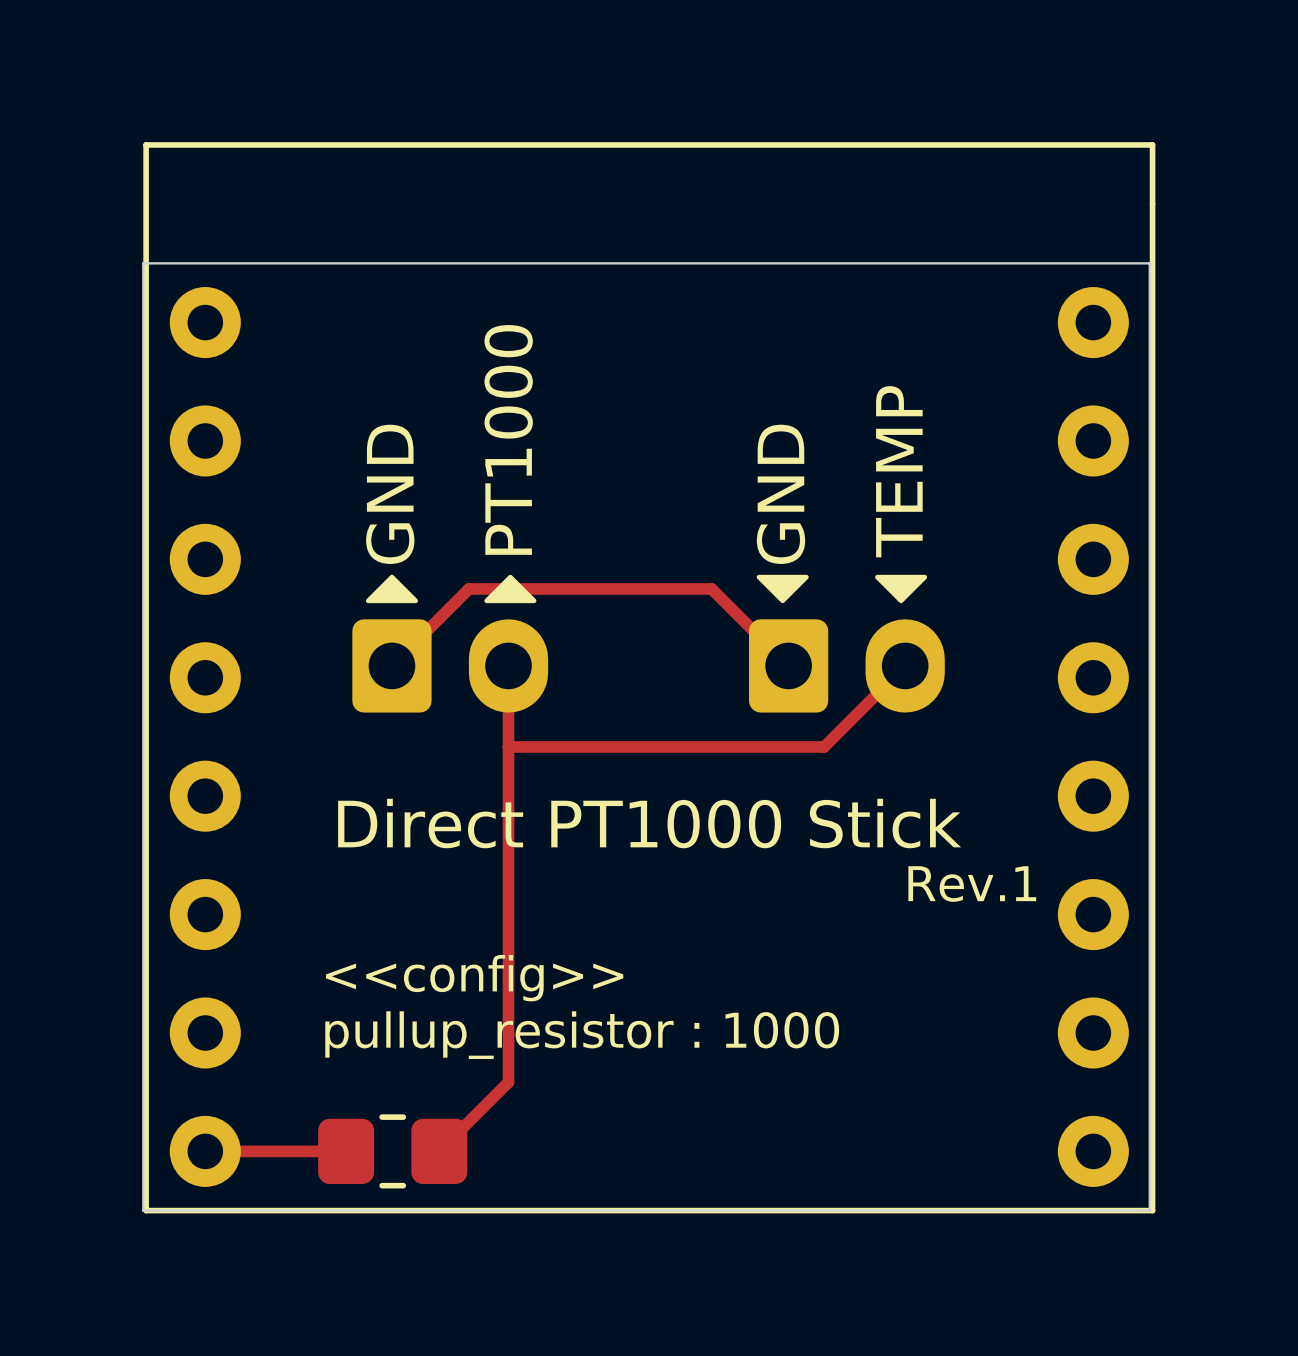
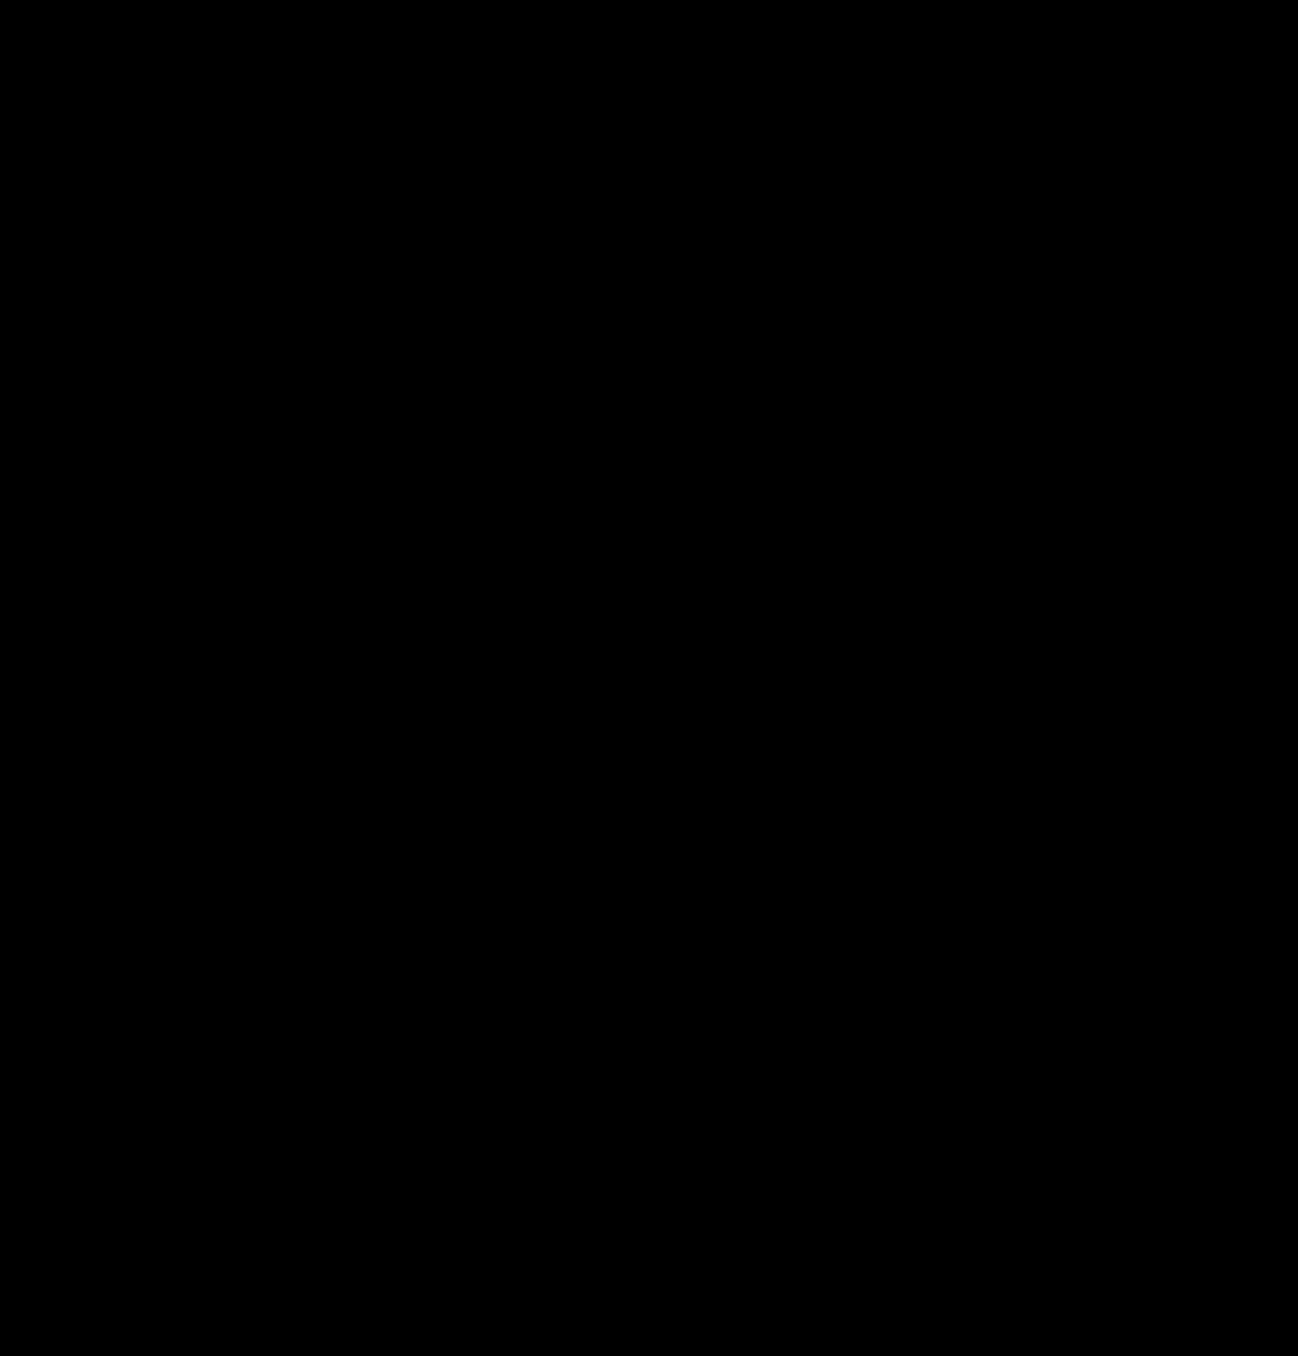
board edge: (143, 263) (143, 1210) (1149, 1210) (1149, 263) (143, 263) -> none
text: PT1000 (508, 439) -> none
text: TEMP (899, 471) -> none
text: GND (390, 494) -> none
text: GND (781, 494) -> none
drawing: [365, 574, 418, 604] -> none
drawing: [484, 574, 537, 604] -> none
drawing: [756, 574, 809, 604] -> none
drawing: [875, 574, 928, 604] -> none
top track: (391, 665) (468, 588) (711, 588) (788, 665) -> none
part: (450, 665) -> none
top track: (508, 665) (508, 1082) (439, 1151) -> none
part: (846, 665) -> none
top track: (905, 665) (824, 746) (508, 746) -> none
part: (649, 677) -> none
text: Direct PT1000 Stick (649, 823) -> none
text: Rev.1 (972, 884) -> none
text: <<config>> (474, 978) -> none
text: pullup_resistor : 1000 (582, 1035) -> none
top track: (205, 1151) (346, 1151) -> none
part: (392, 1151) -> none

